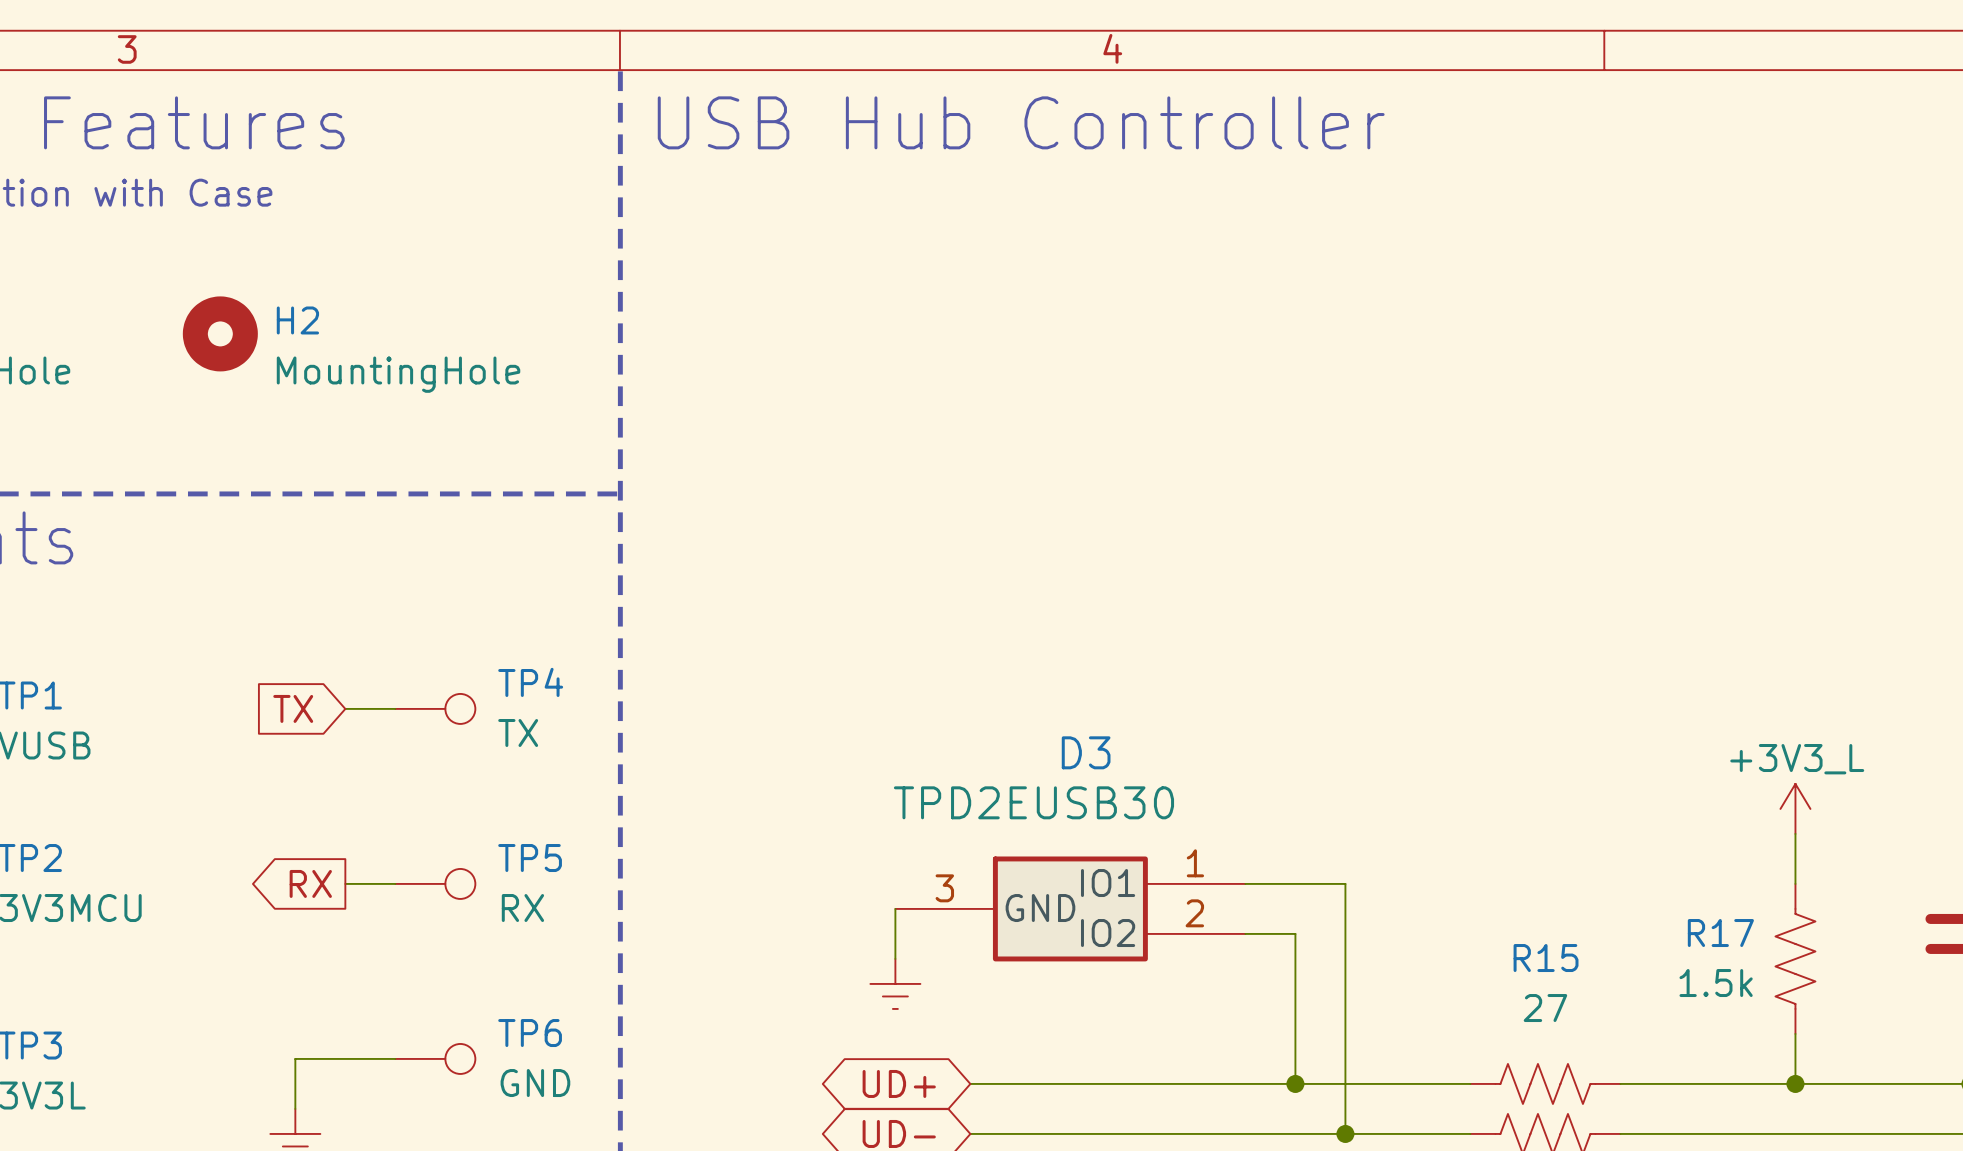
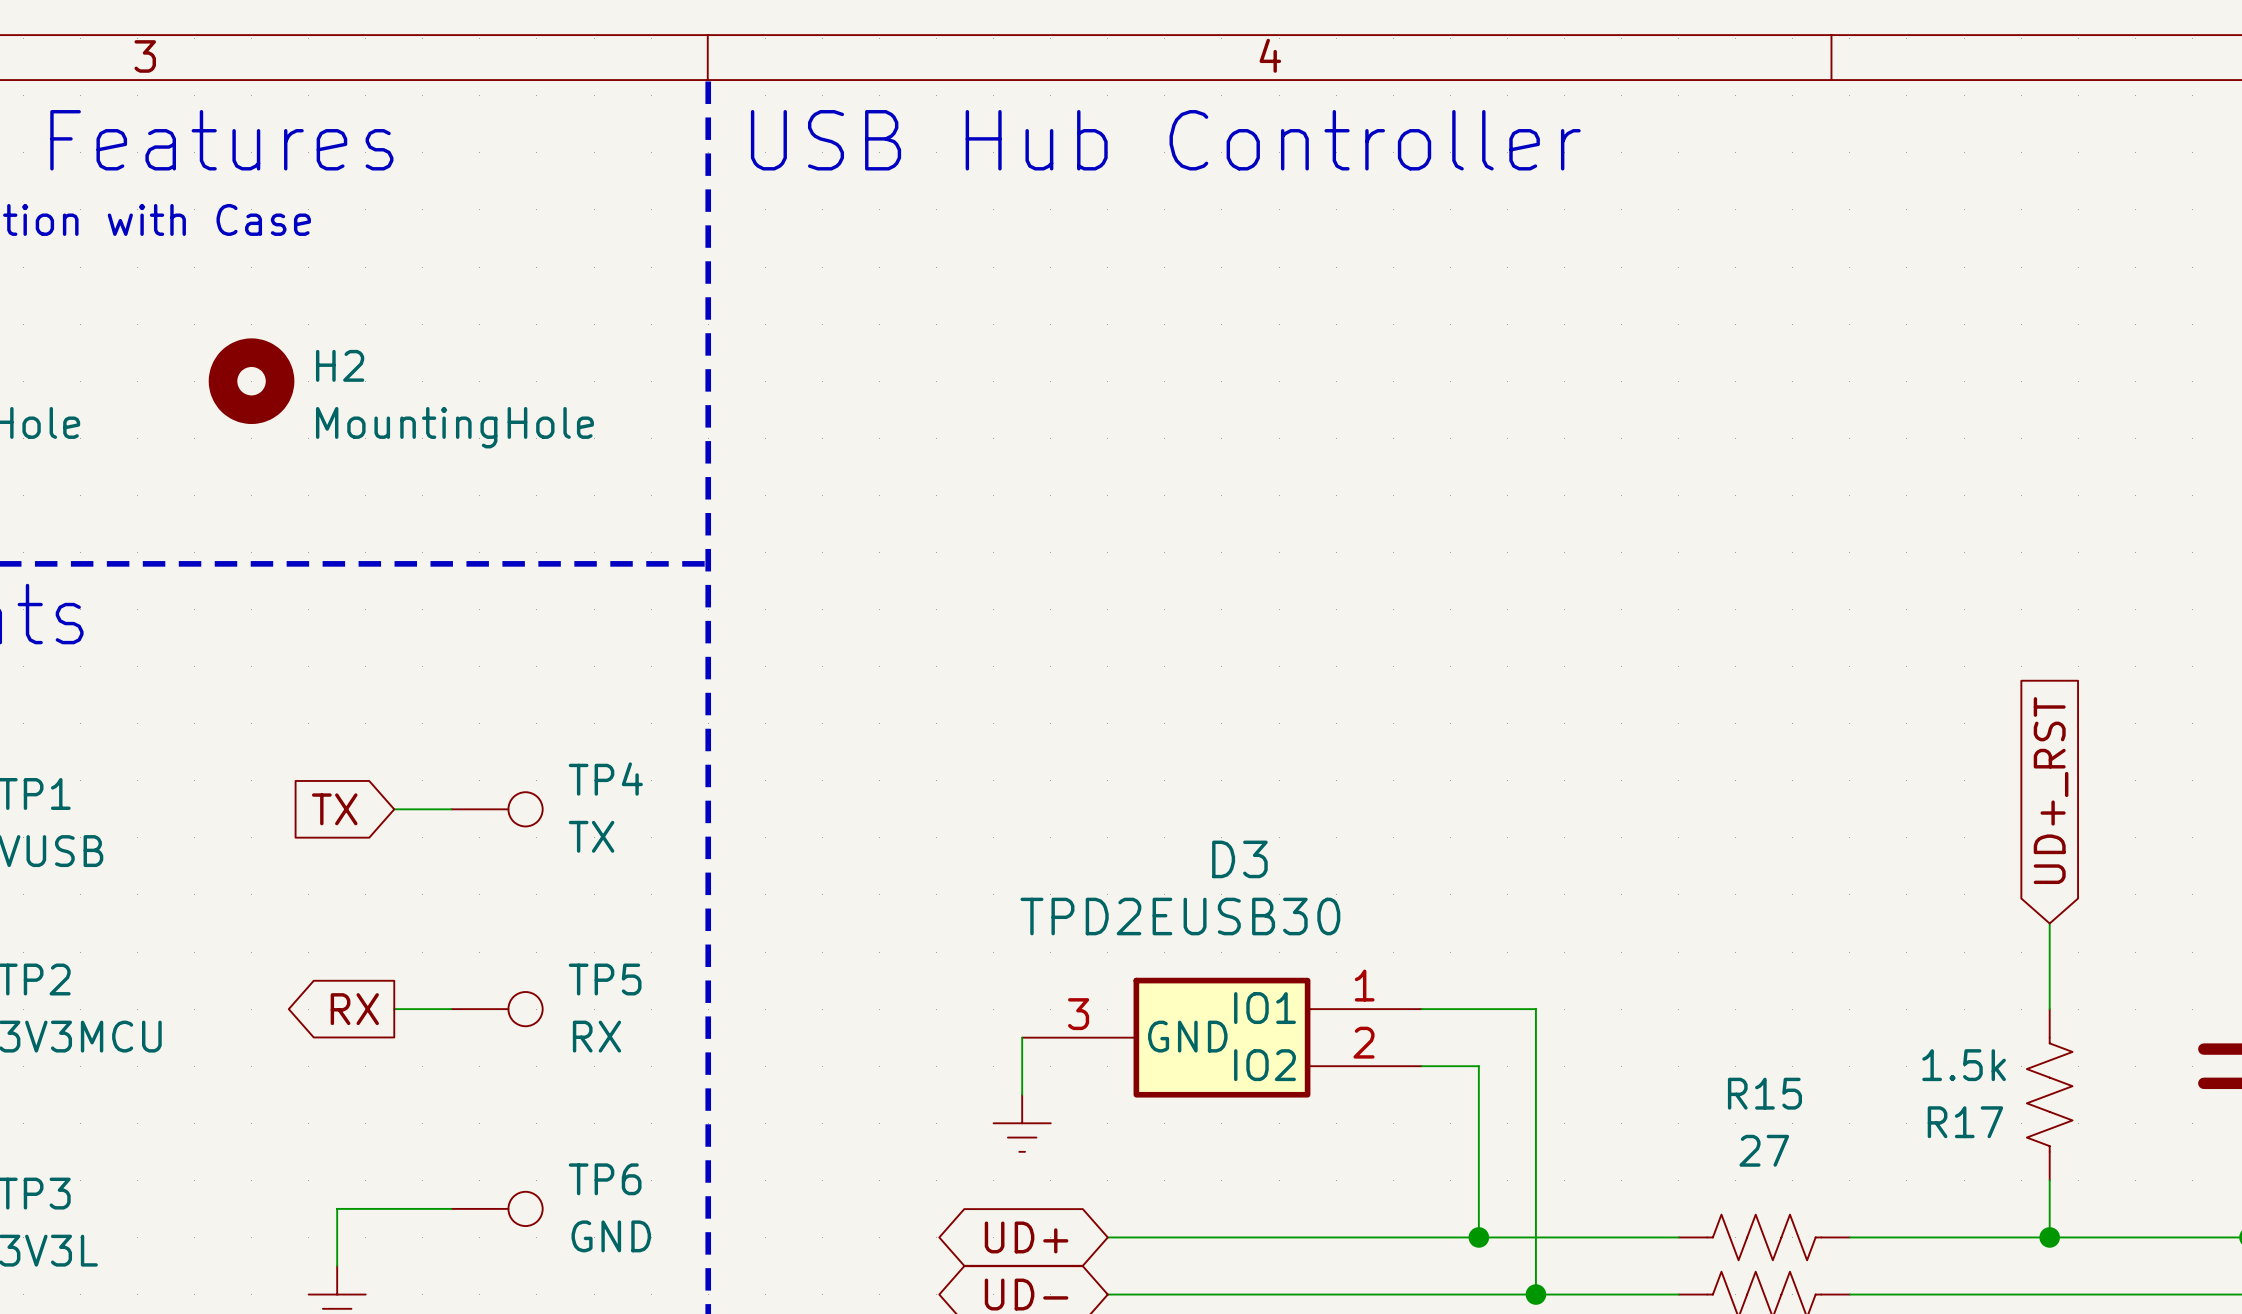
global label: none -> UD+_RST (2051, 790)
power symbol: +3V3_L (1795, 808) -> none
R17 name position: R17 (1720, 933) -> R17 (1965, 1122)
R17 value position: 1.5k (1716, 983) -> 1.5k (1964, 1065)

